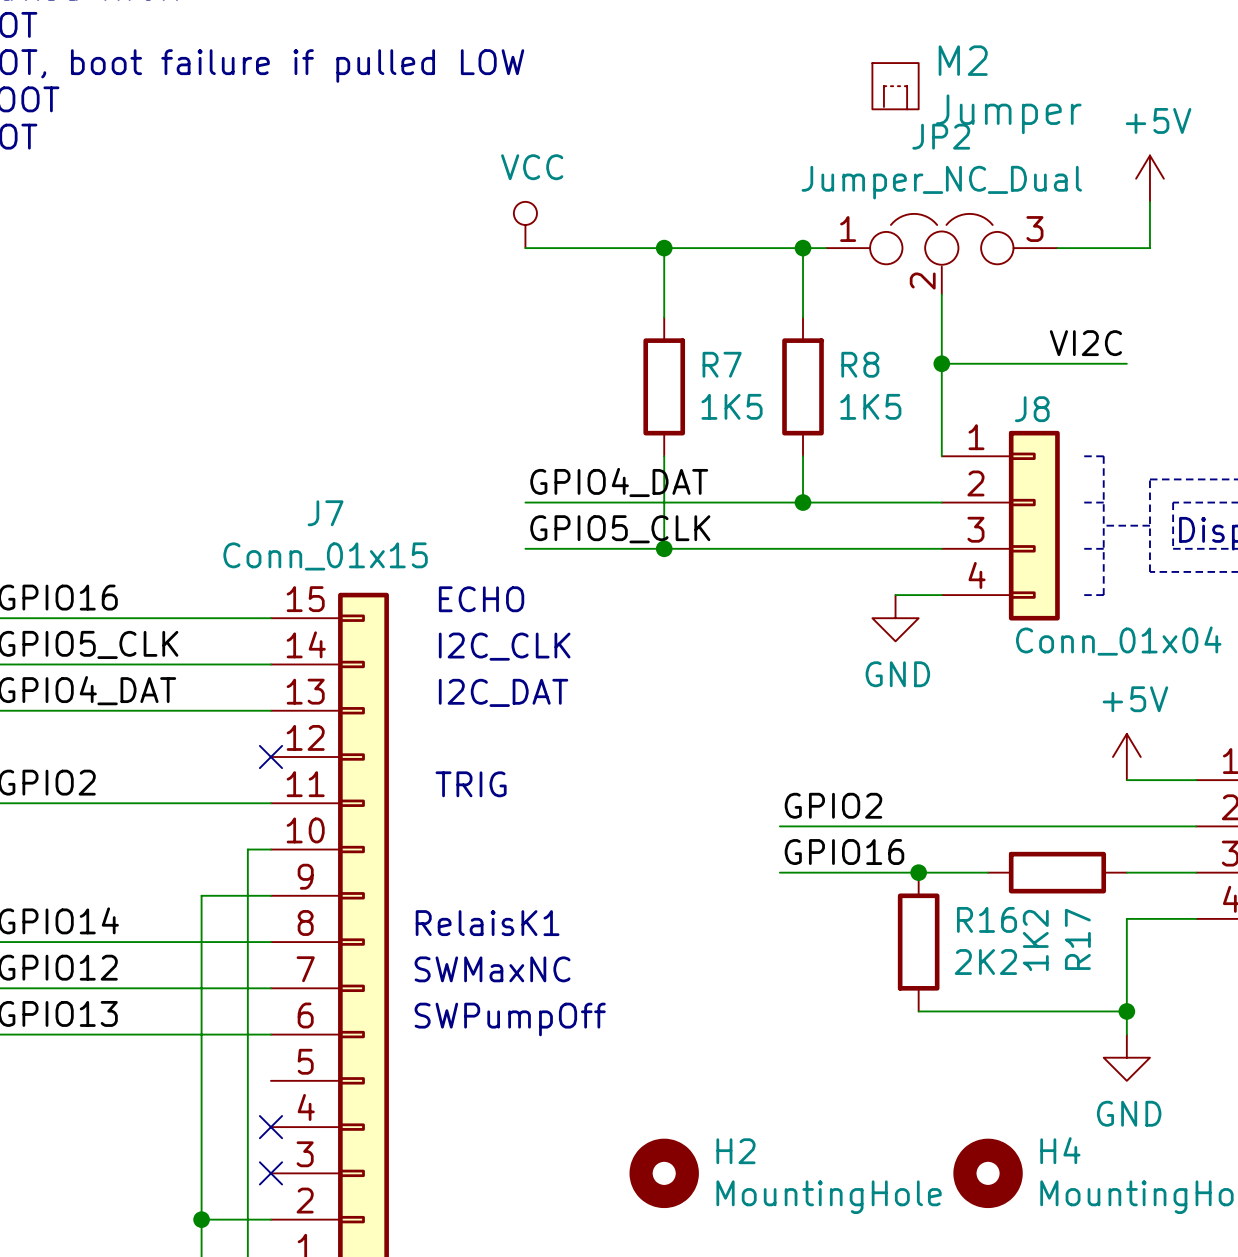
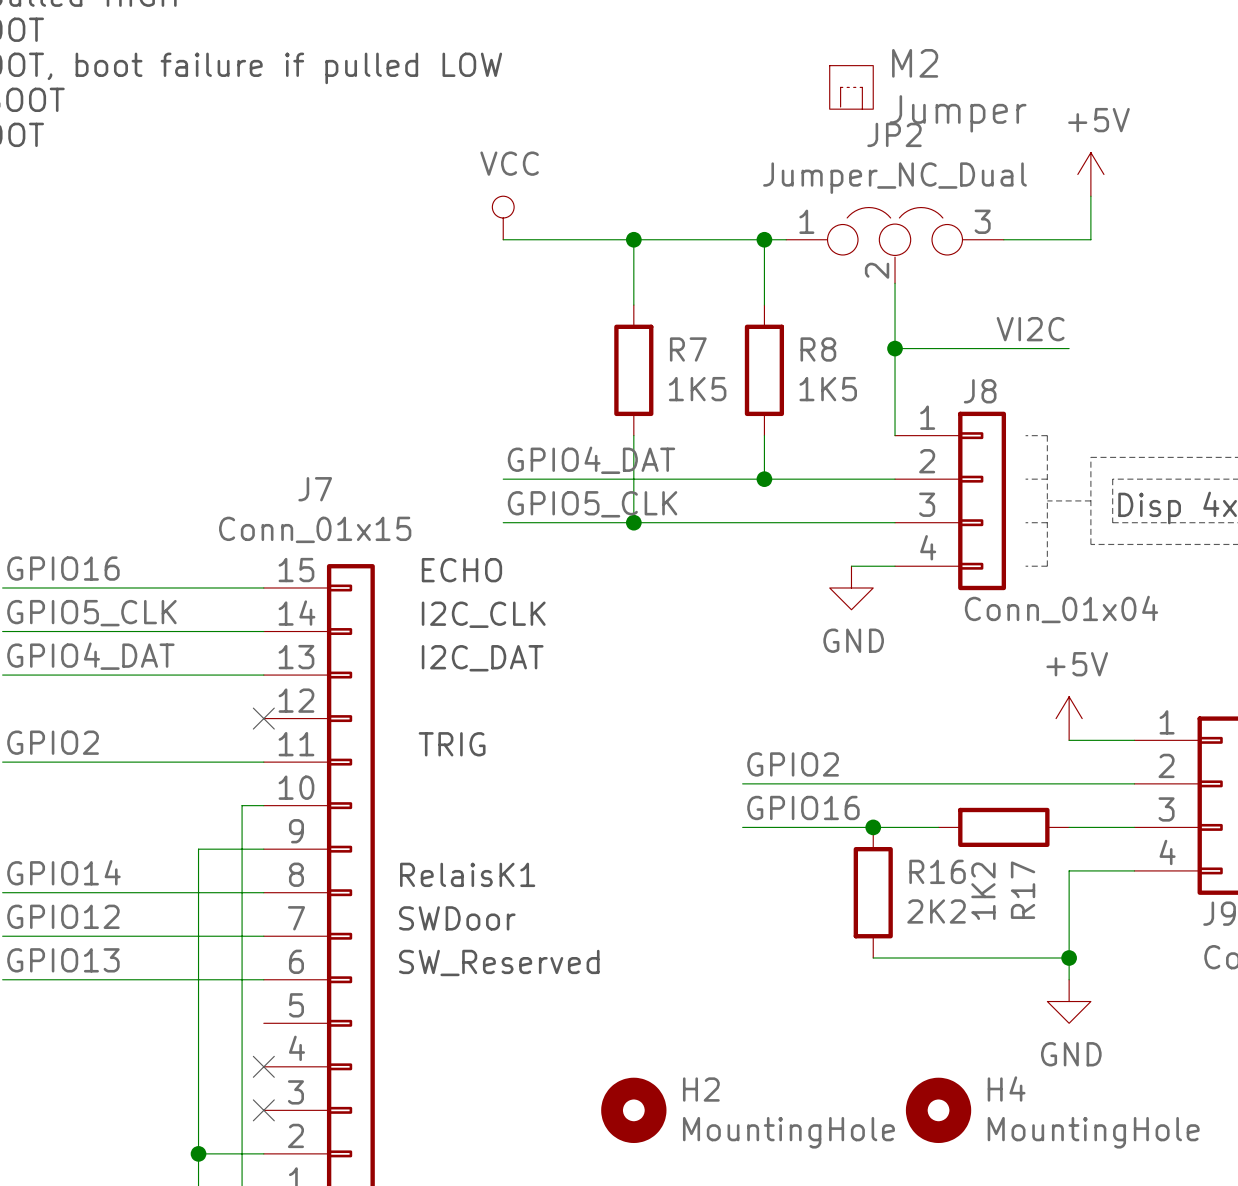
text: SWMaxNC (492, 969) -> SWDoor (457, 918)
text: SWPumpOff (510, 1019) -> SW_Reserved (499, 962)

